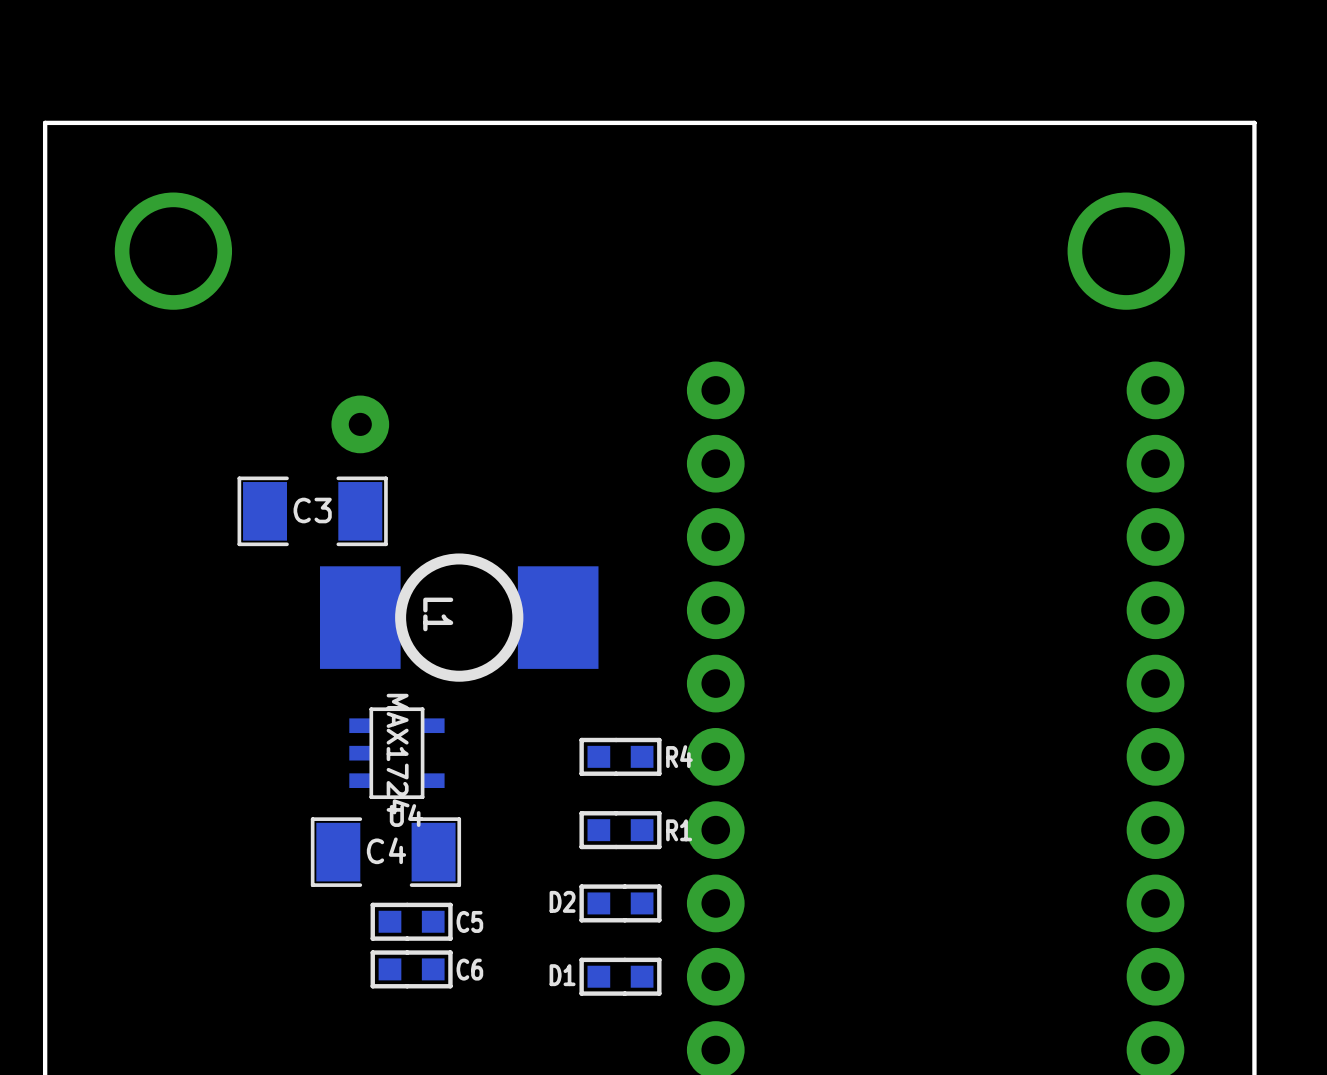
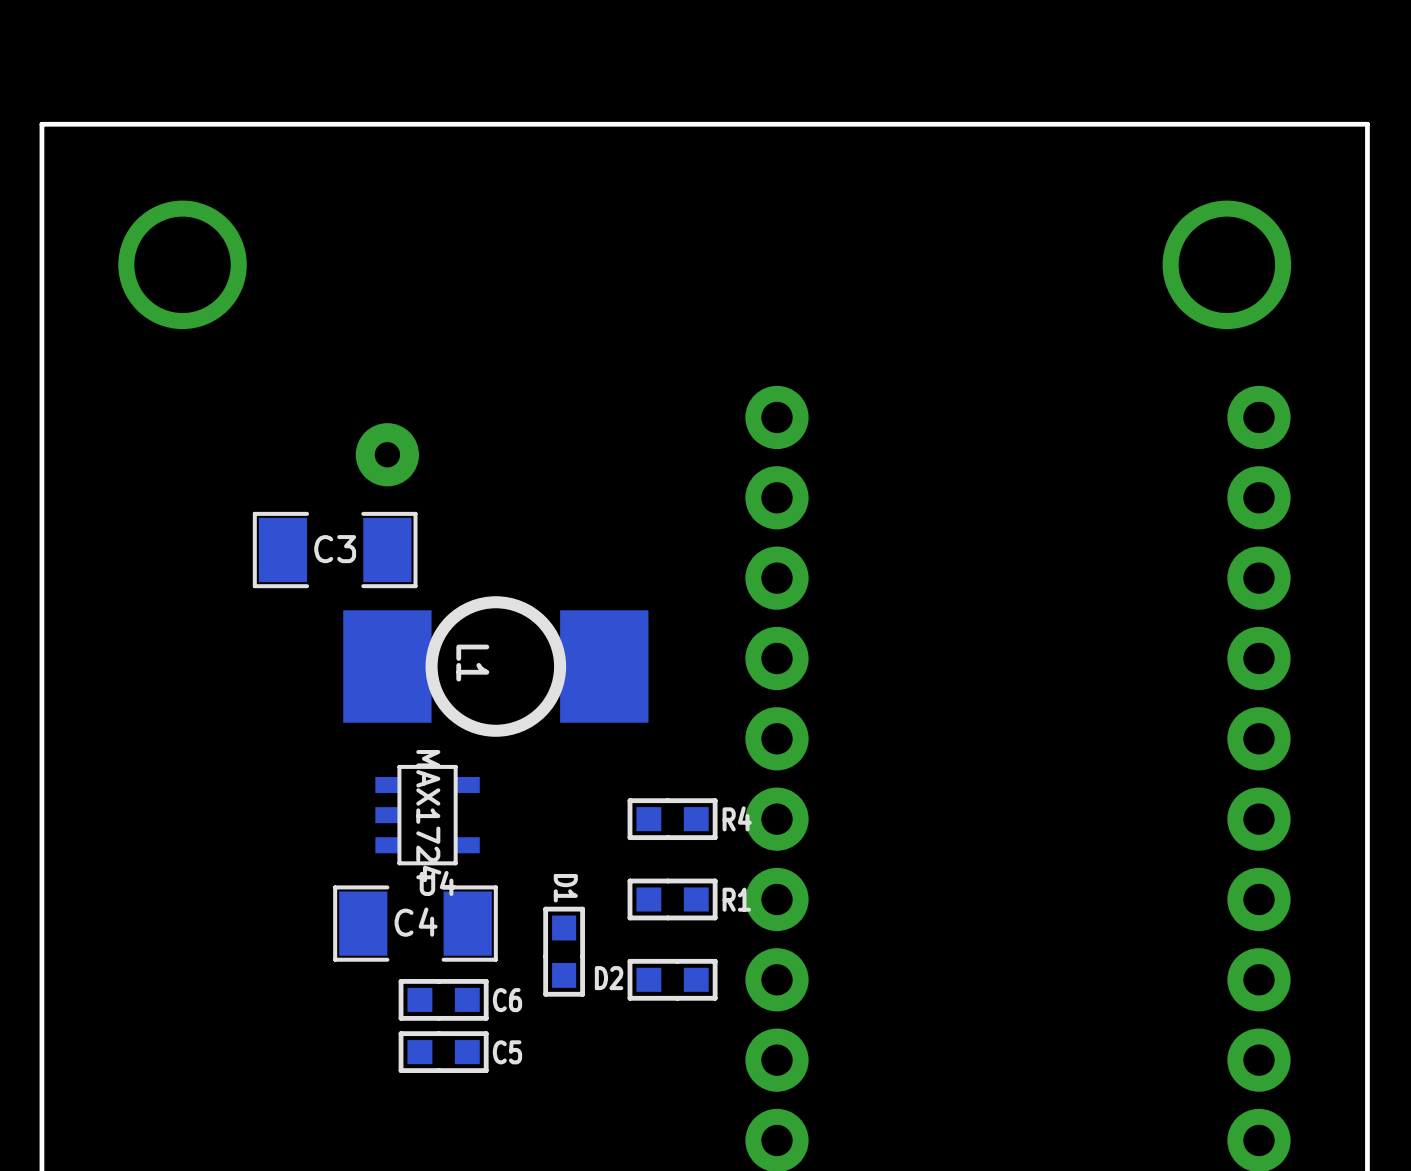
C5 name: C5 (469, 921) -> C6 (507, 1000)
C6 name: C6 (469, 969) -> C5 (507, 1052)
D1 rotation: 0° (620, 976) -> 90° clockwise (564, 951)
D1 position: (620, 976) -> (564, 951)

